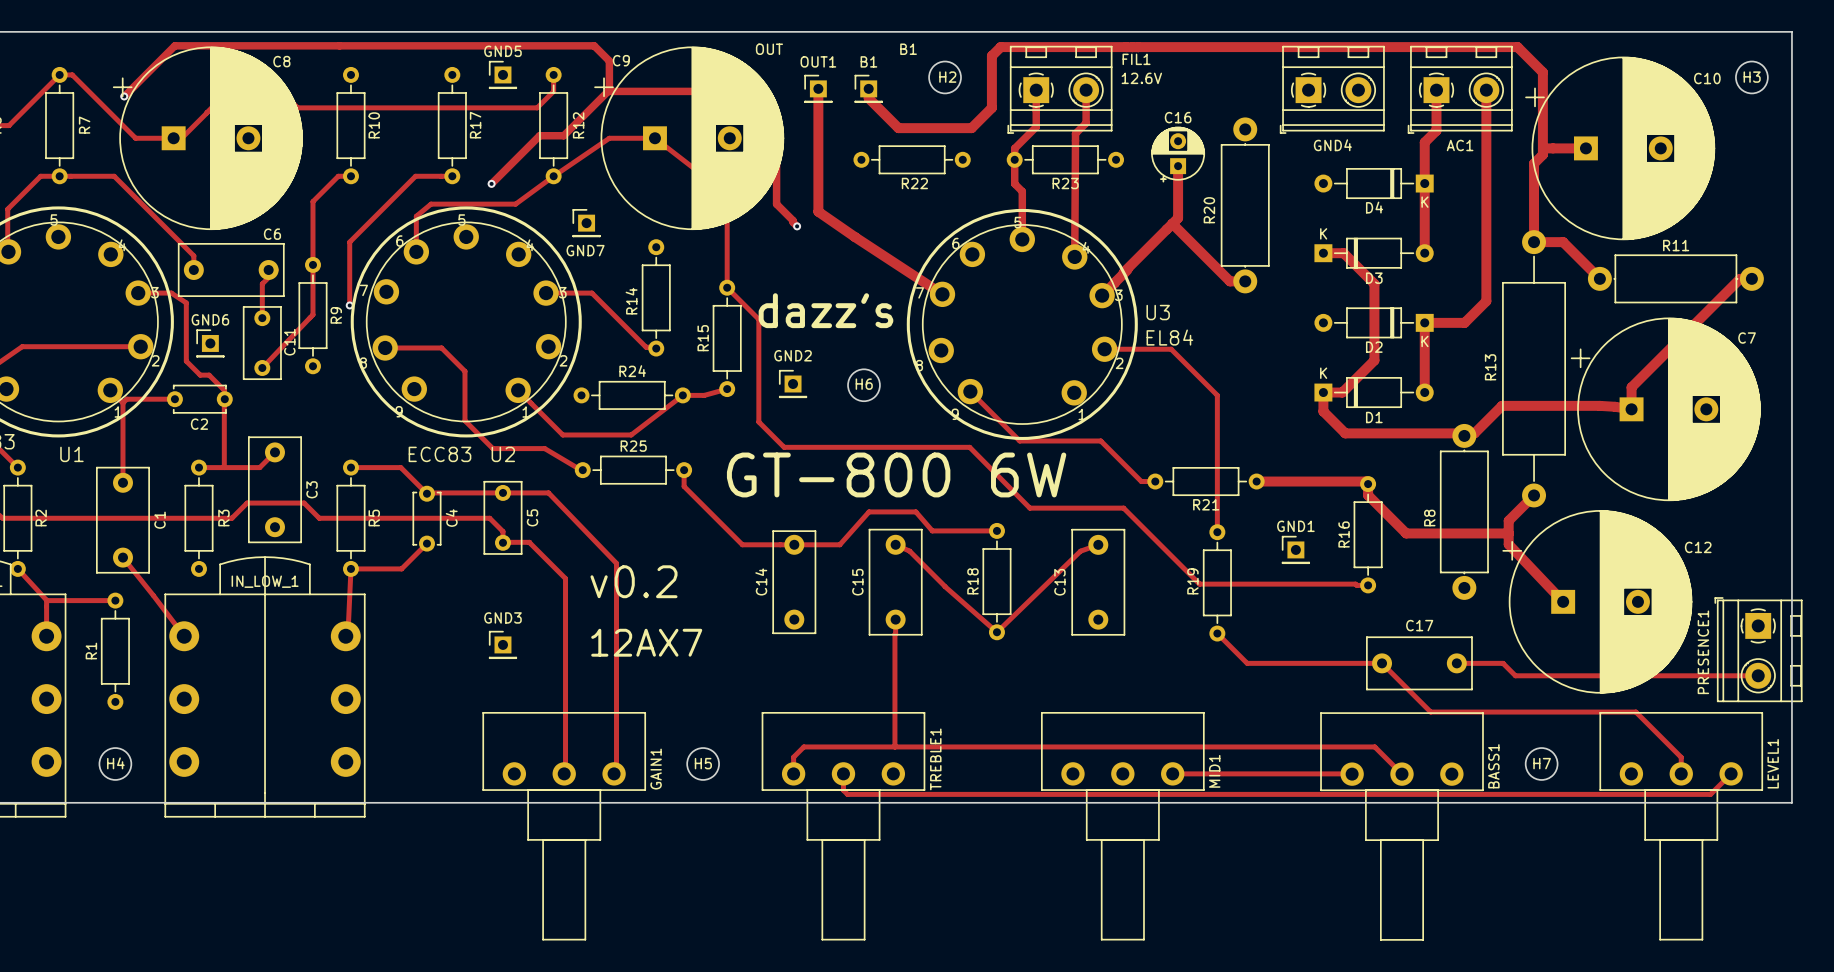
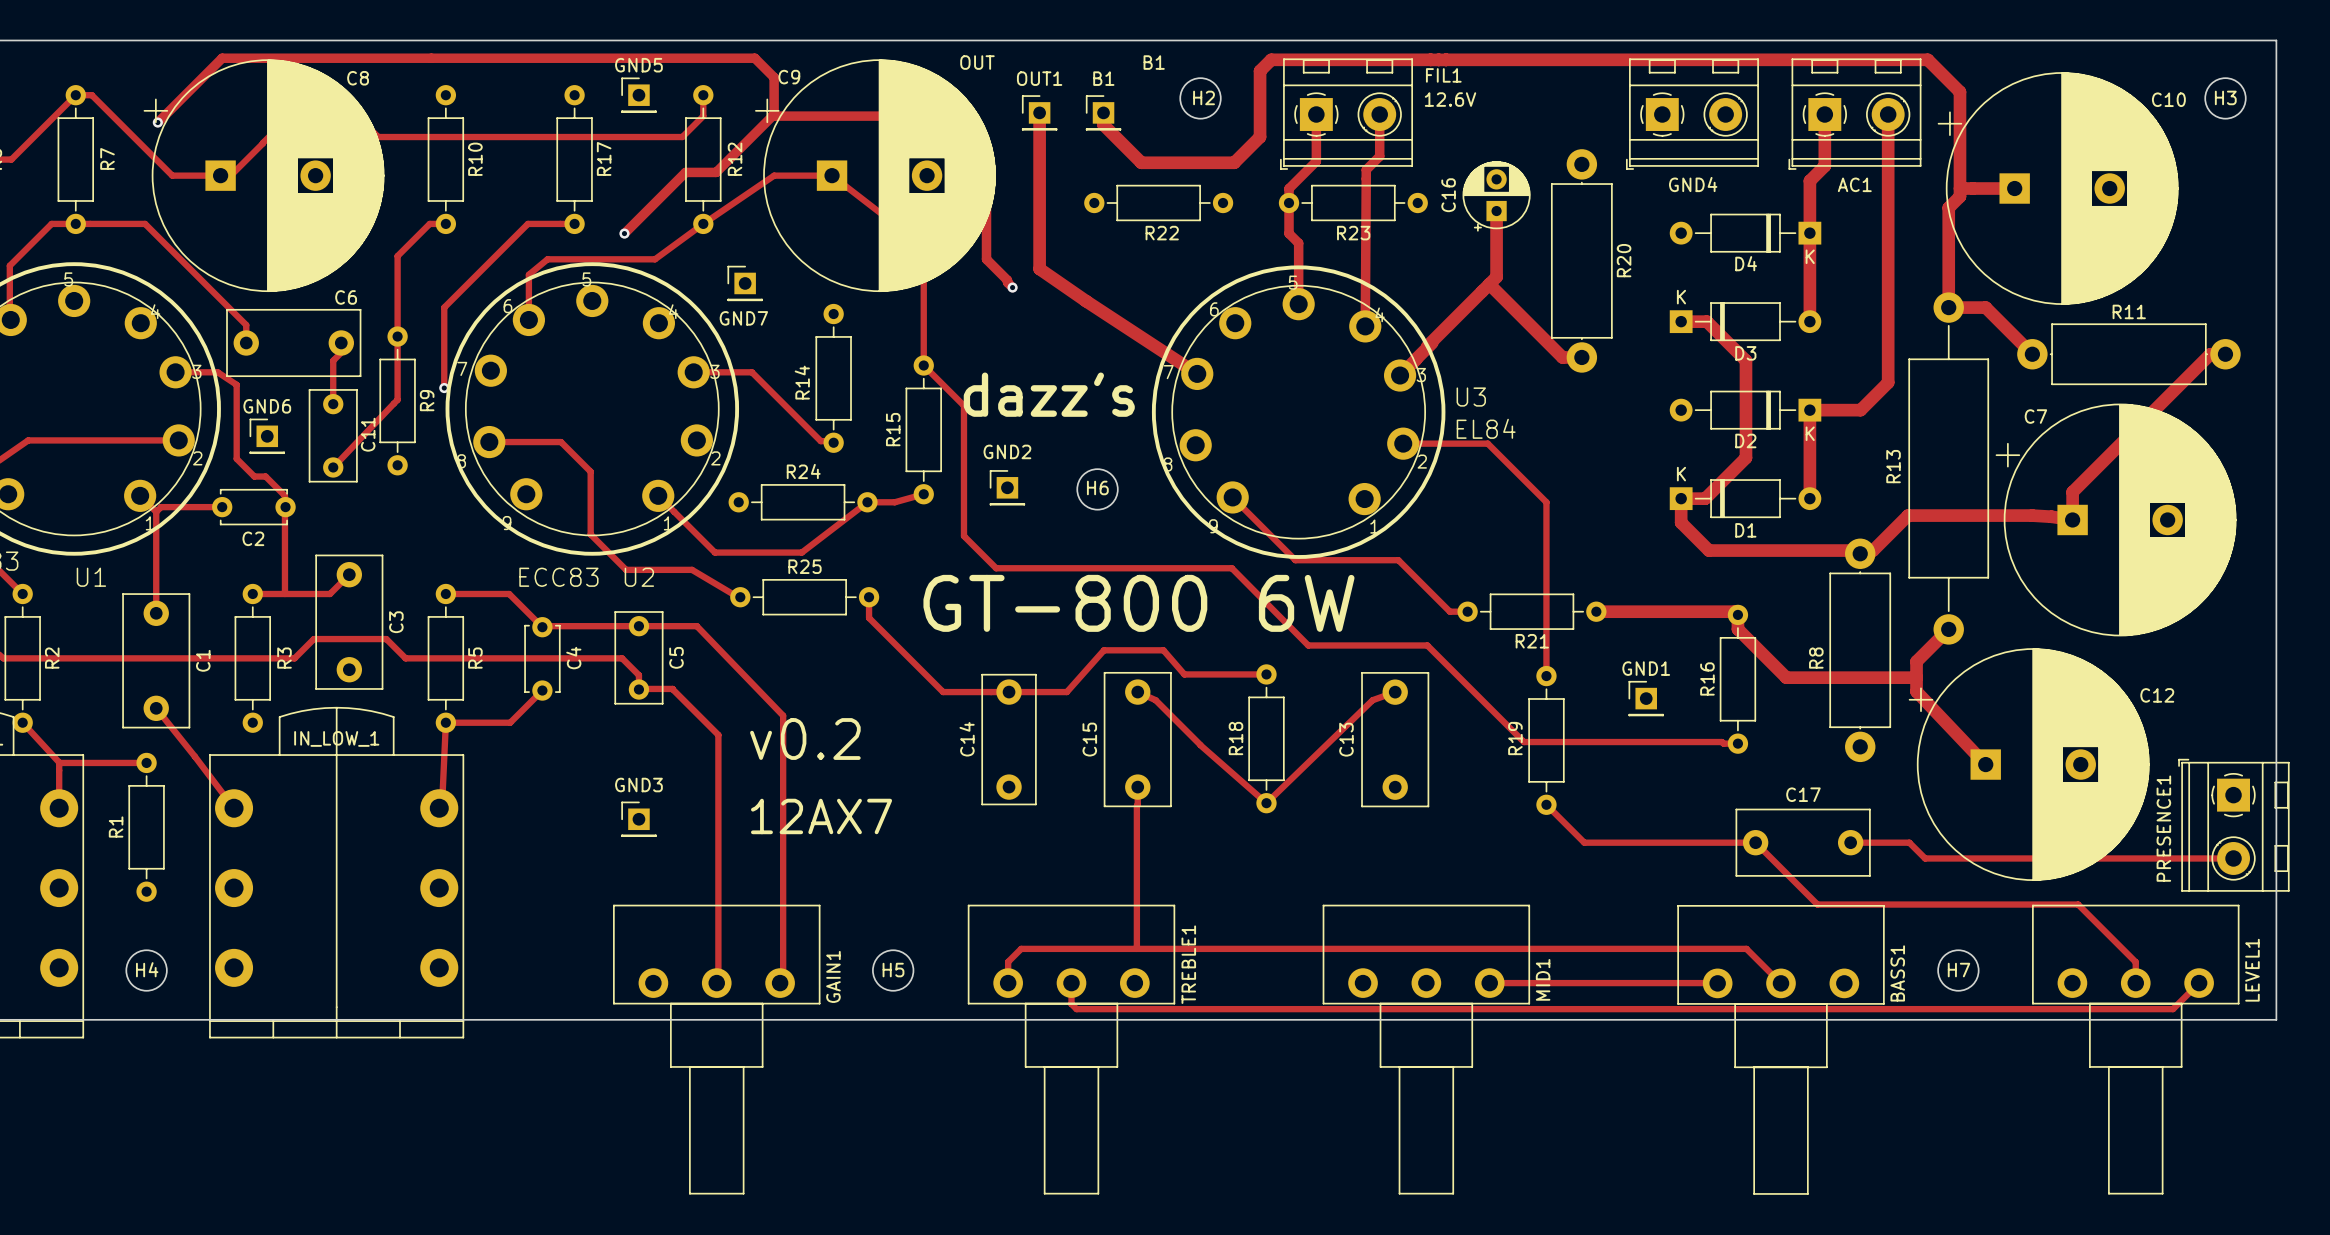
C16 name rotation: 0° (1178, 117) -> 90° counterclockwise (1448, 195)
C16 name position: C16 (1178, 117) -> C16 (1448, 195)
R20 name position: R20 (1209, 210) -> R20 (1624, 260)
C7 name position: C7 (1747, 338) -> C7 (2035, 416)

